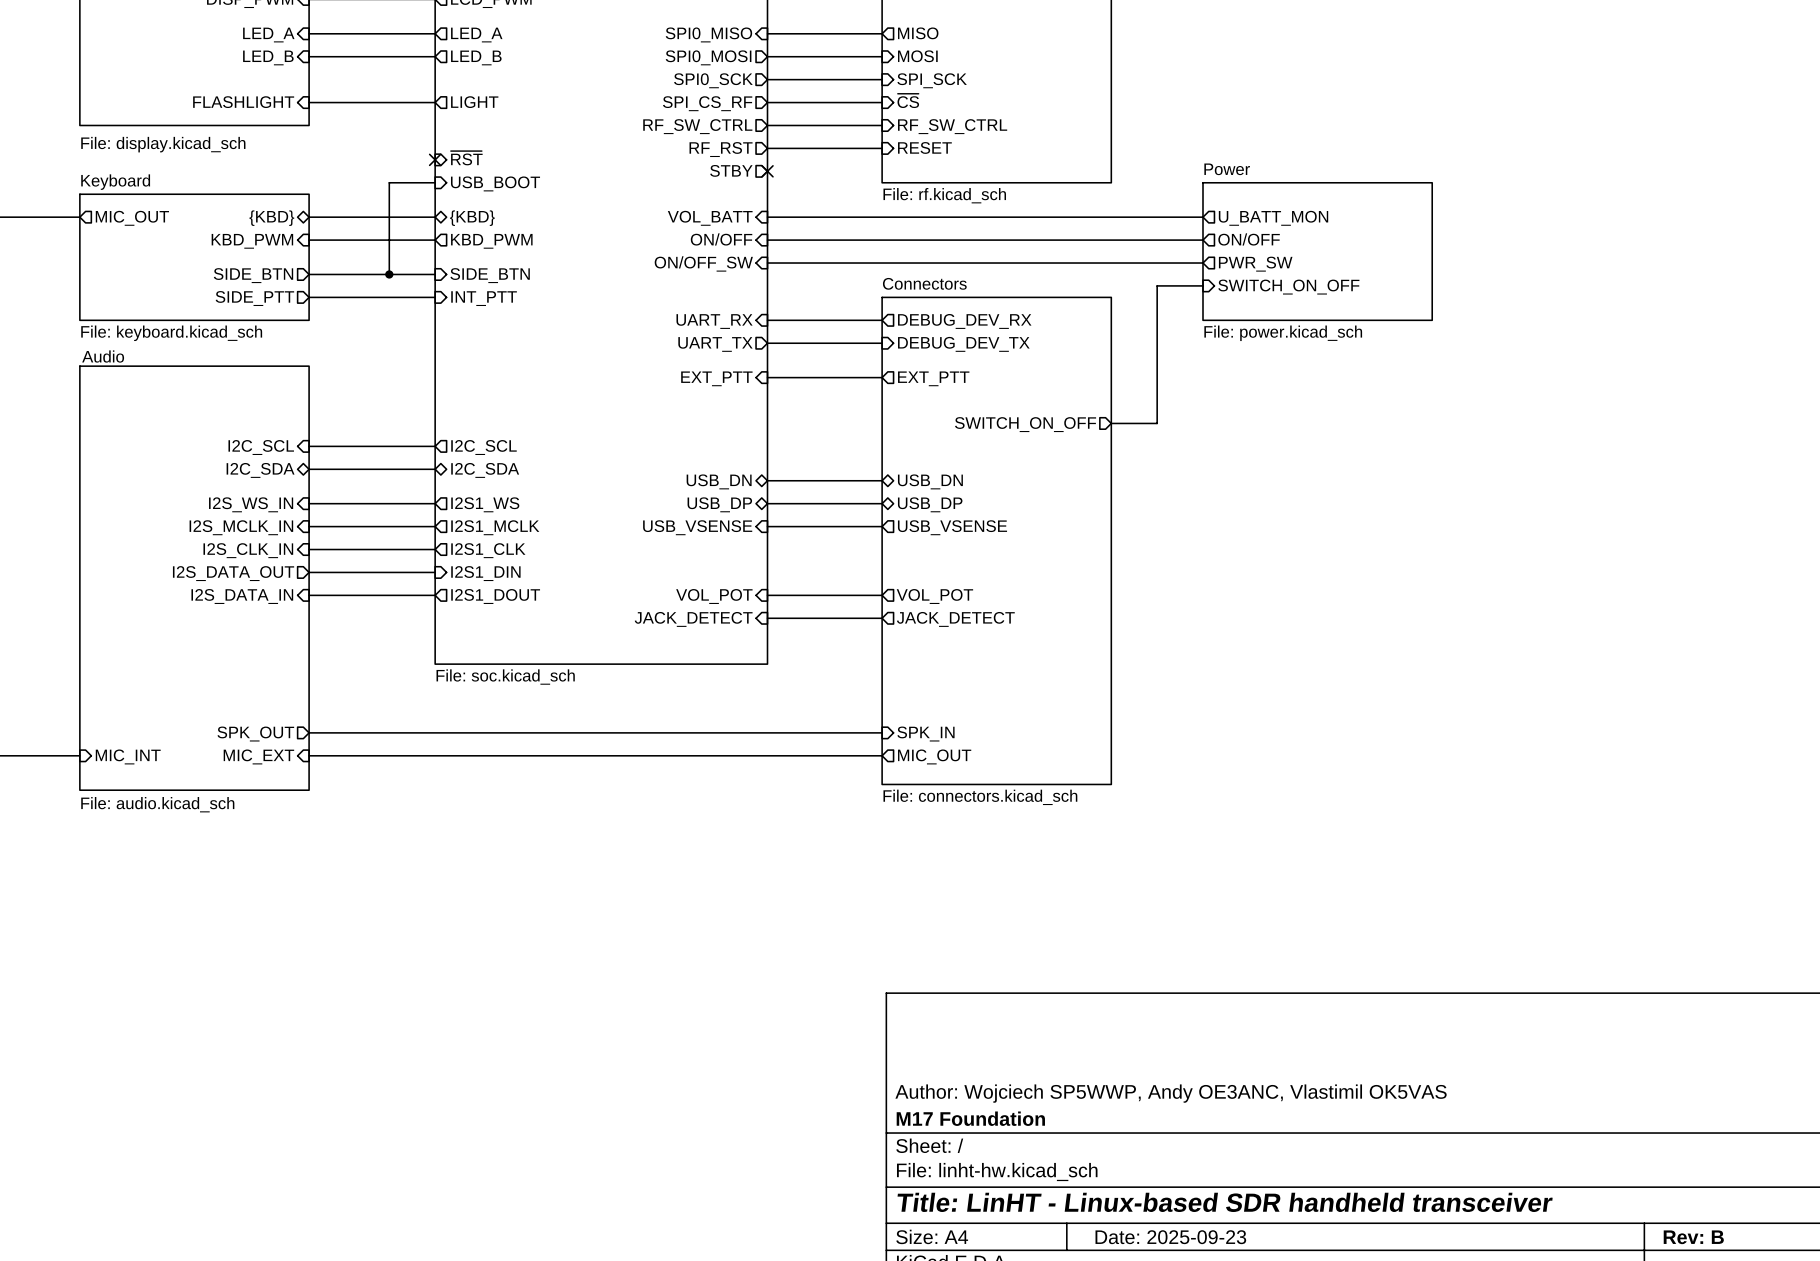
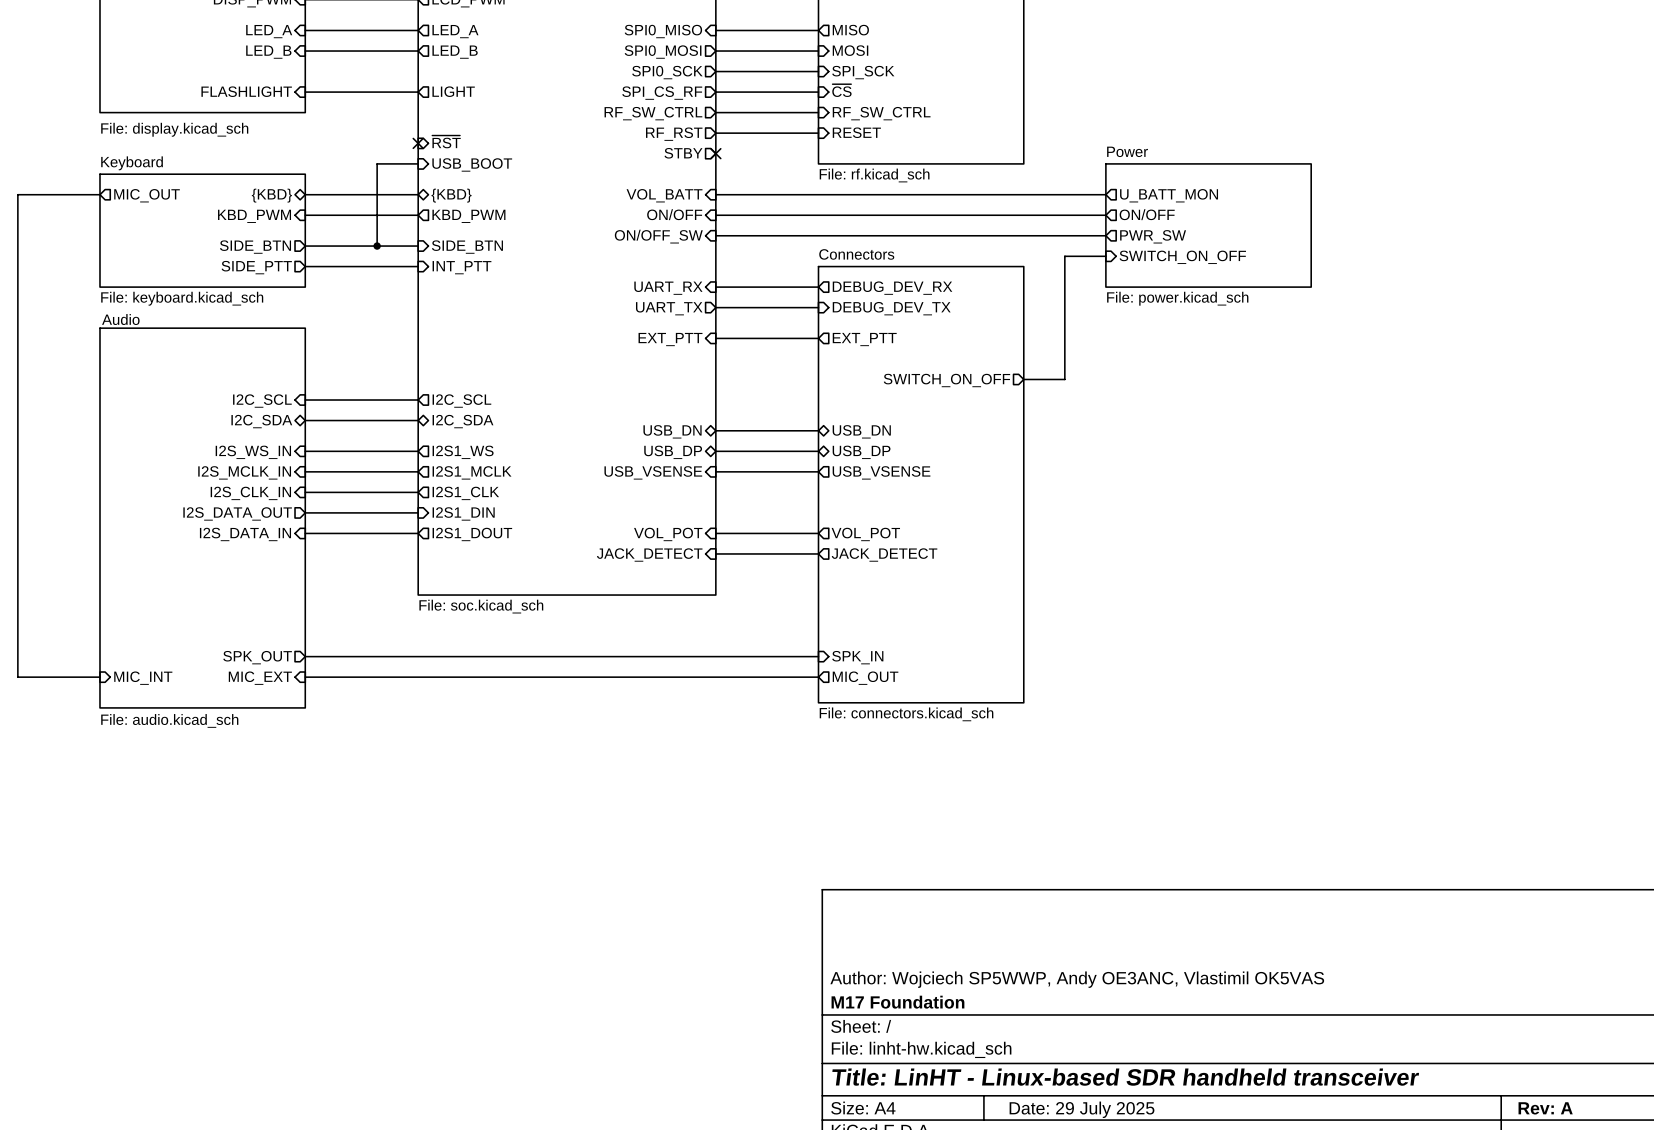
title block: Date: 2025-09-23 (1170, 1237) -> Date: 29 July 2025 (1082, 1109)
title block: Rev: B (1693, 1237) -> Rev: A (1545, 1108)

